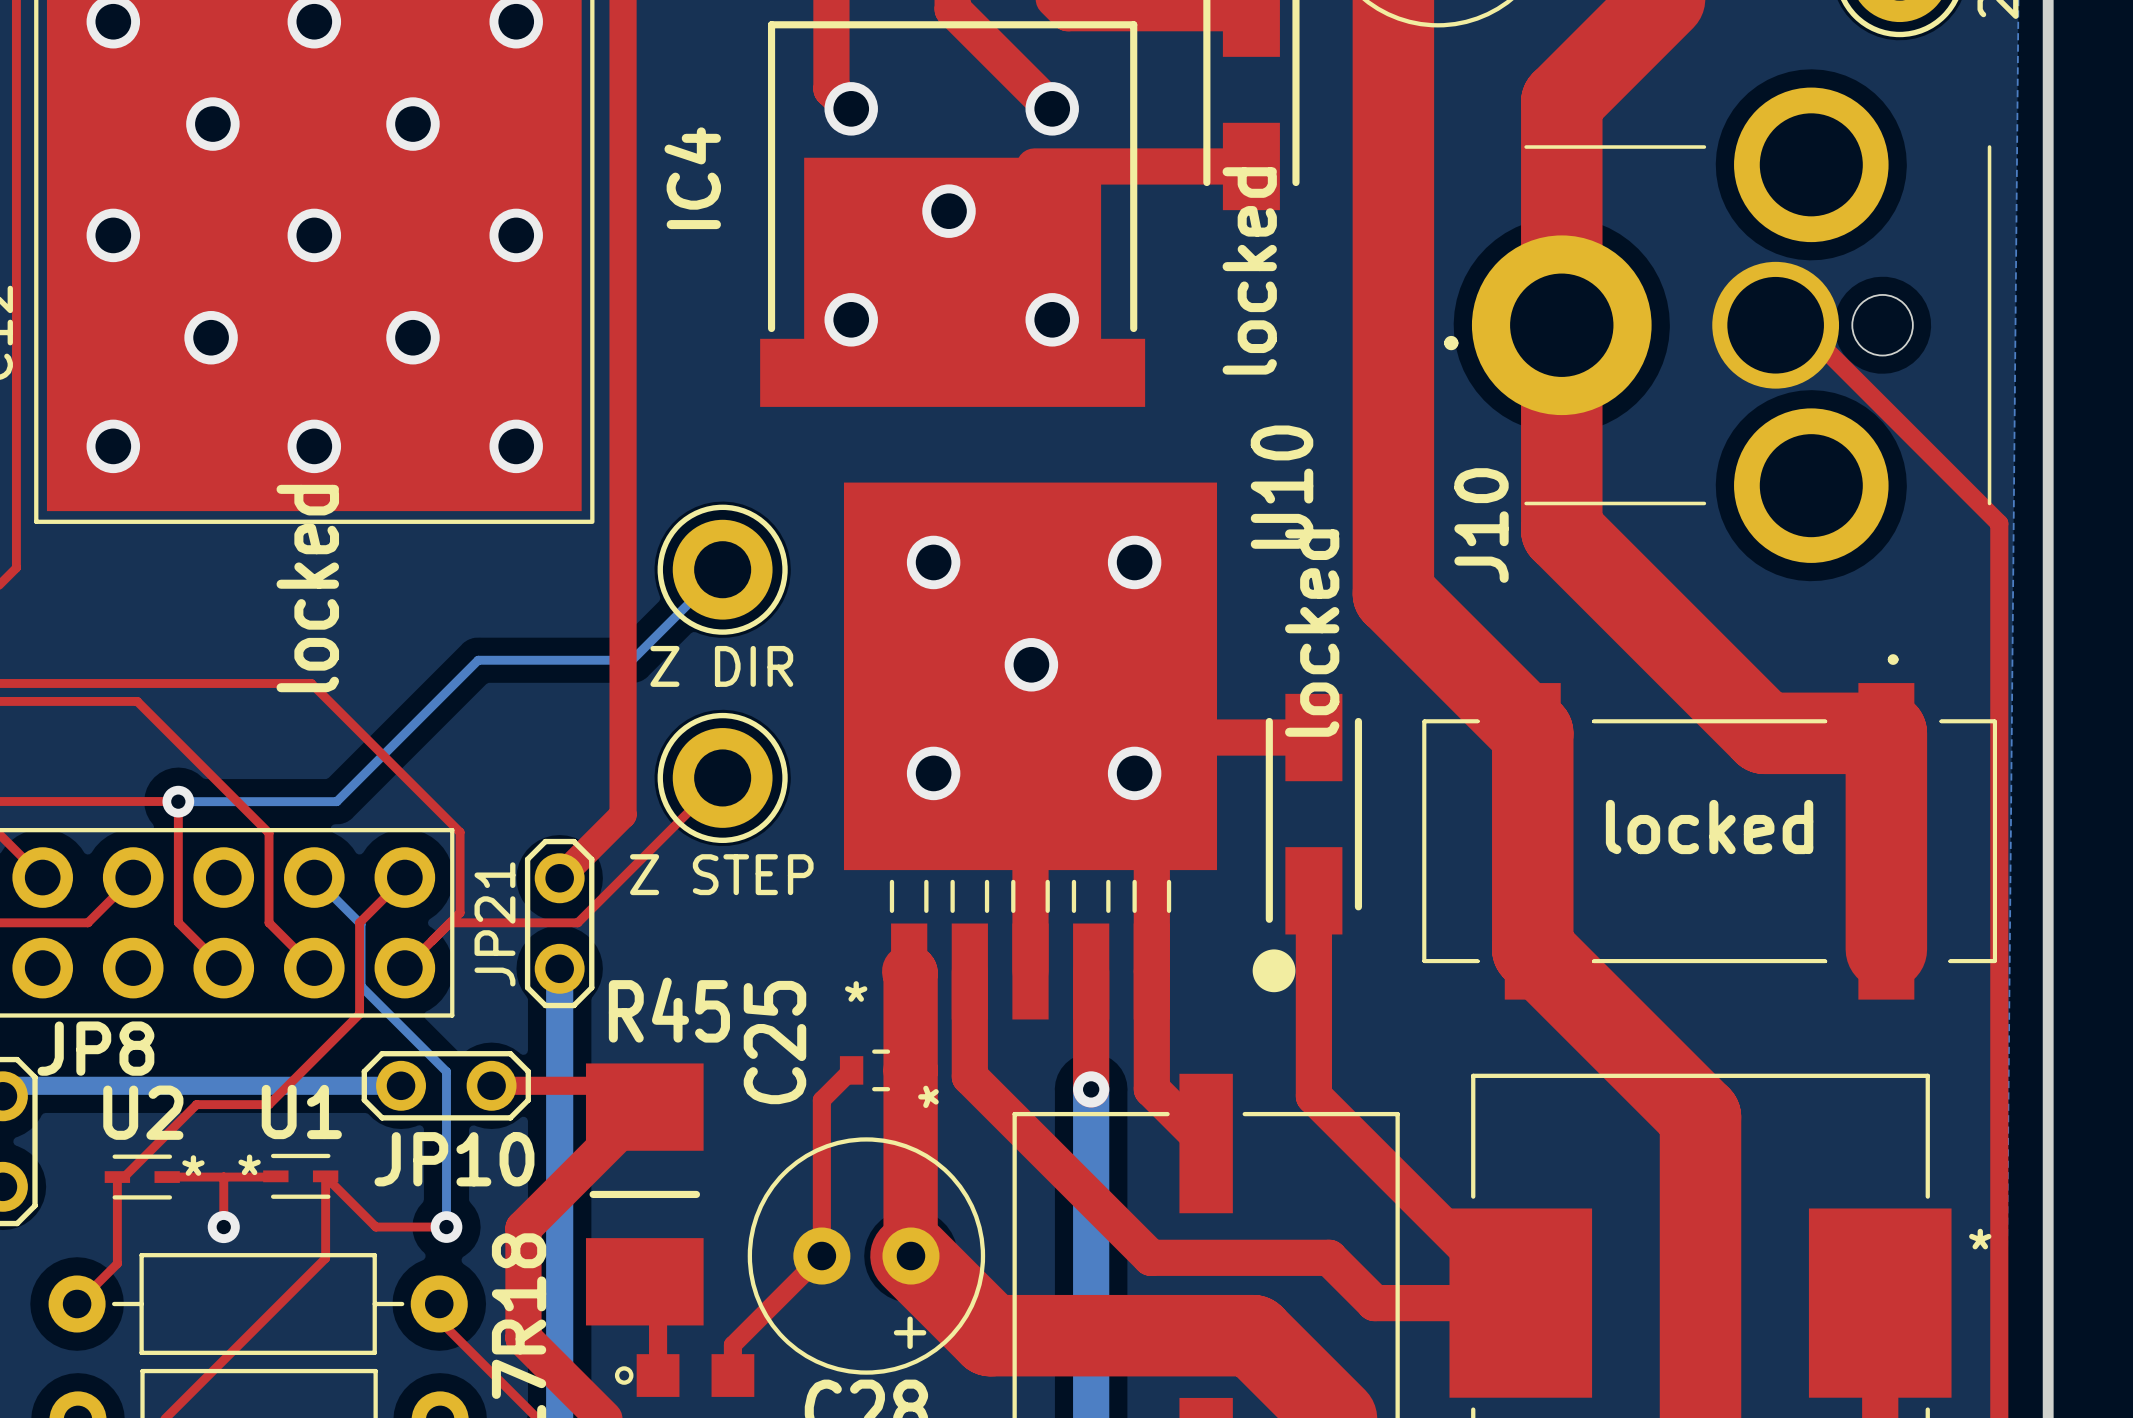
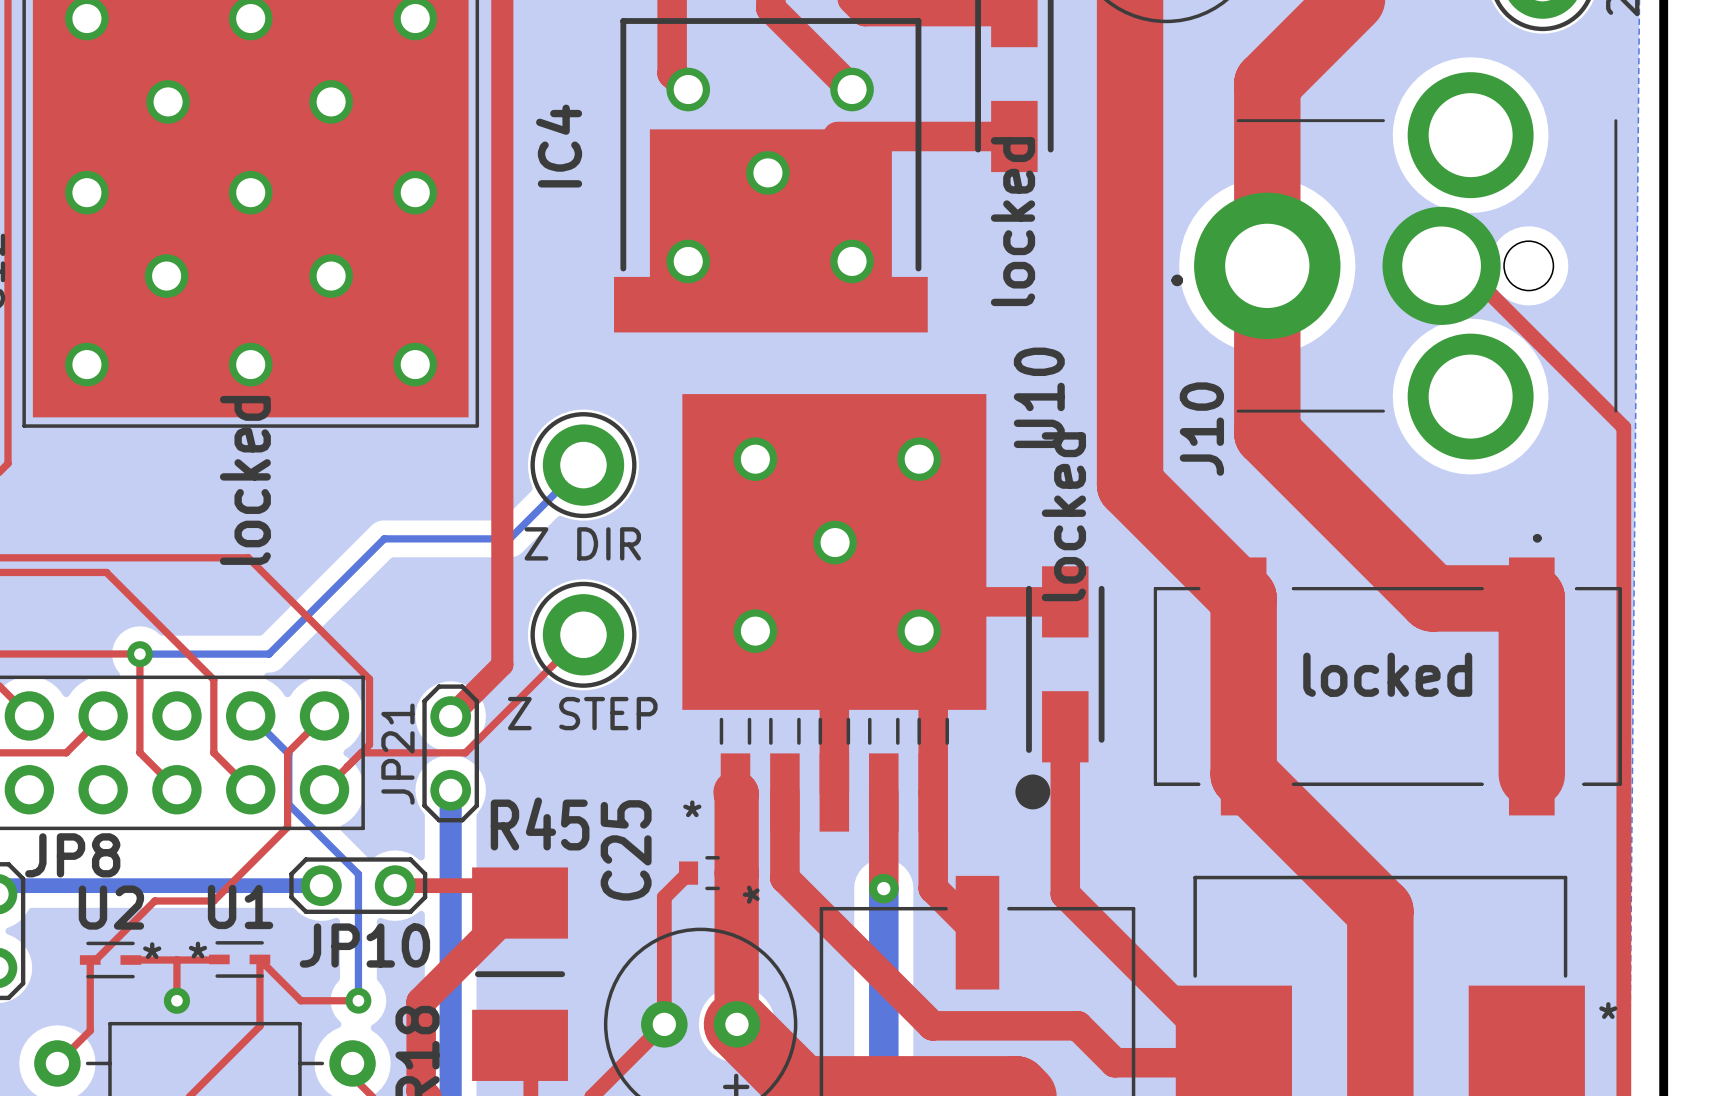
J10 footprint: [1444, 87, 1992, 563] -> [1171, 72, 1618, 460]

